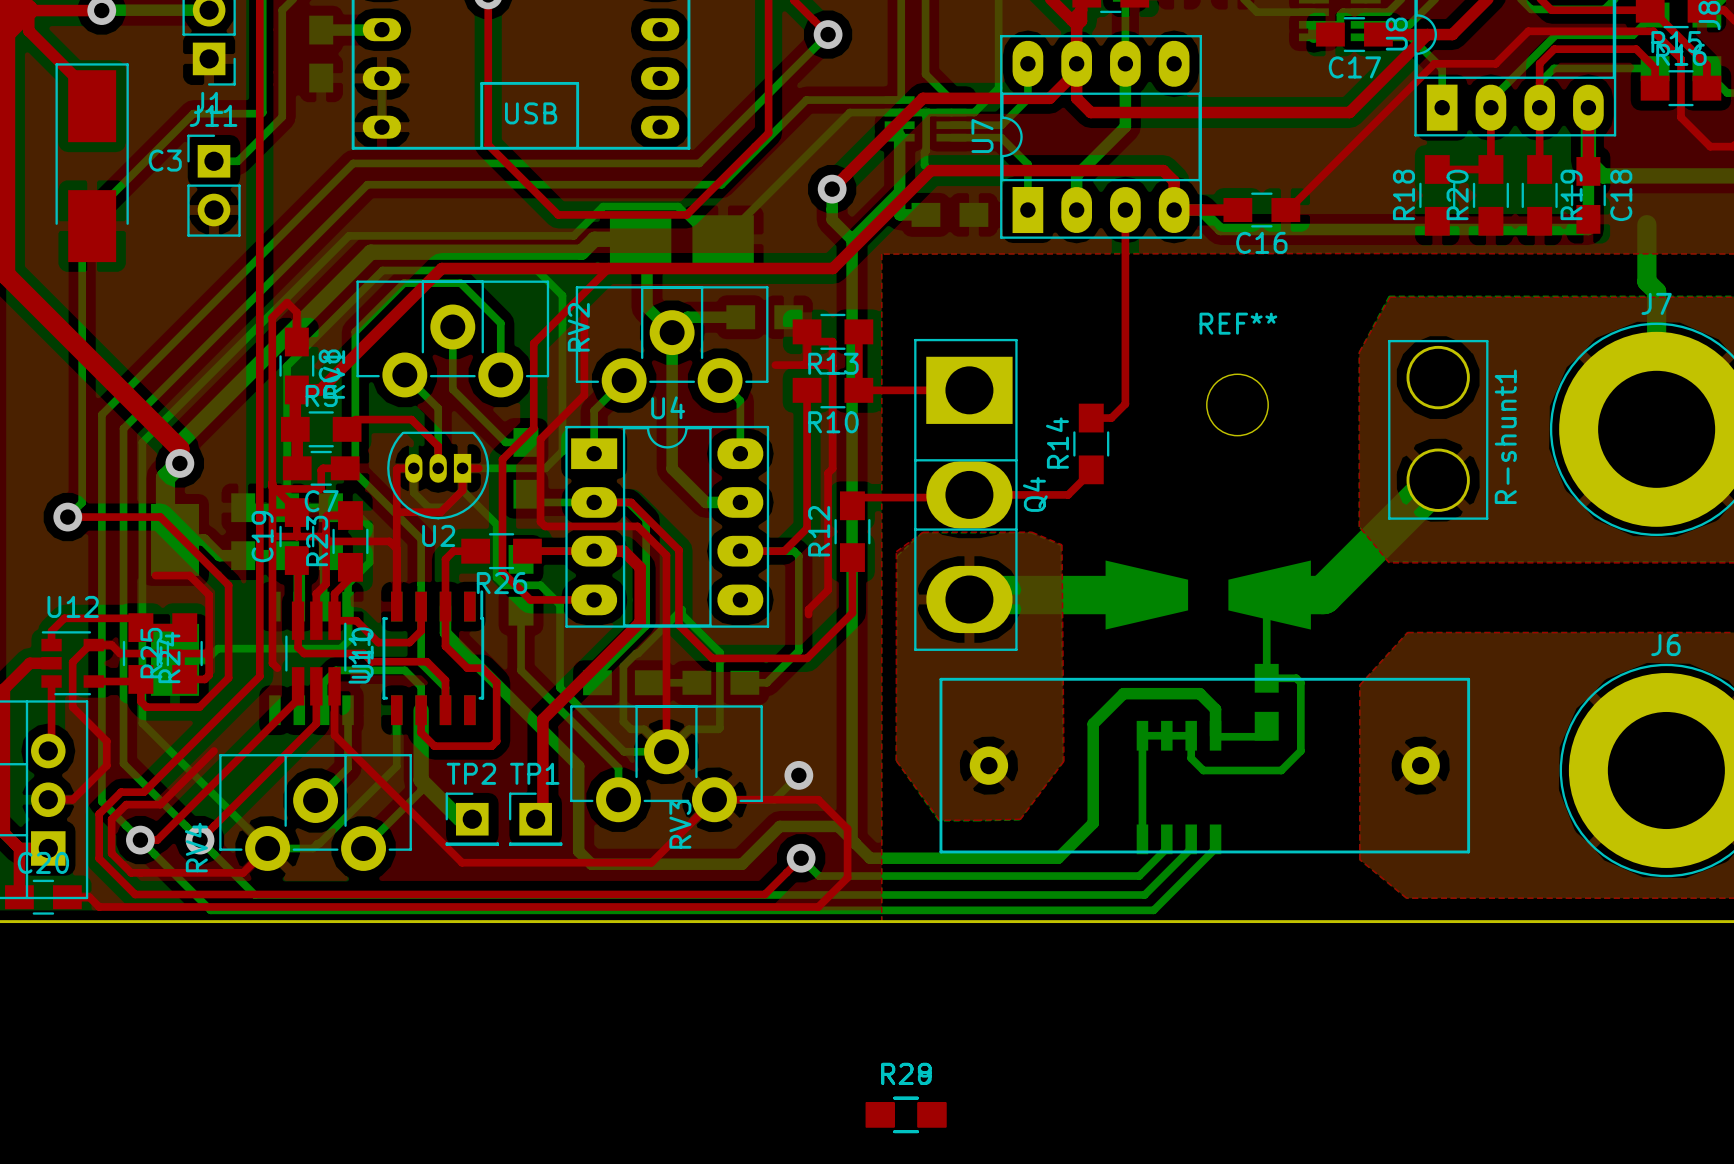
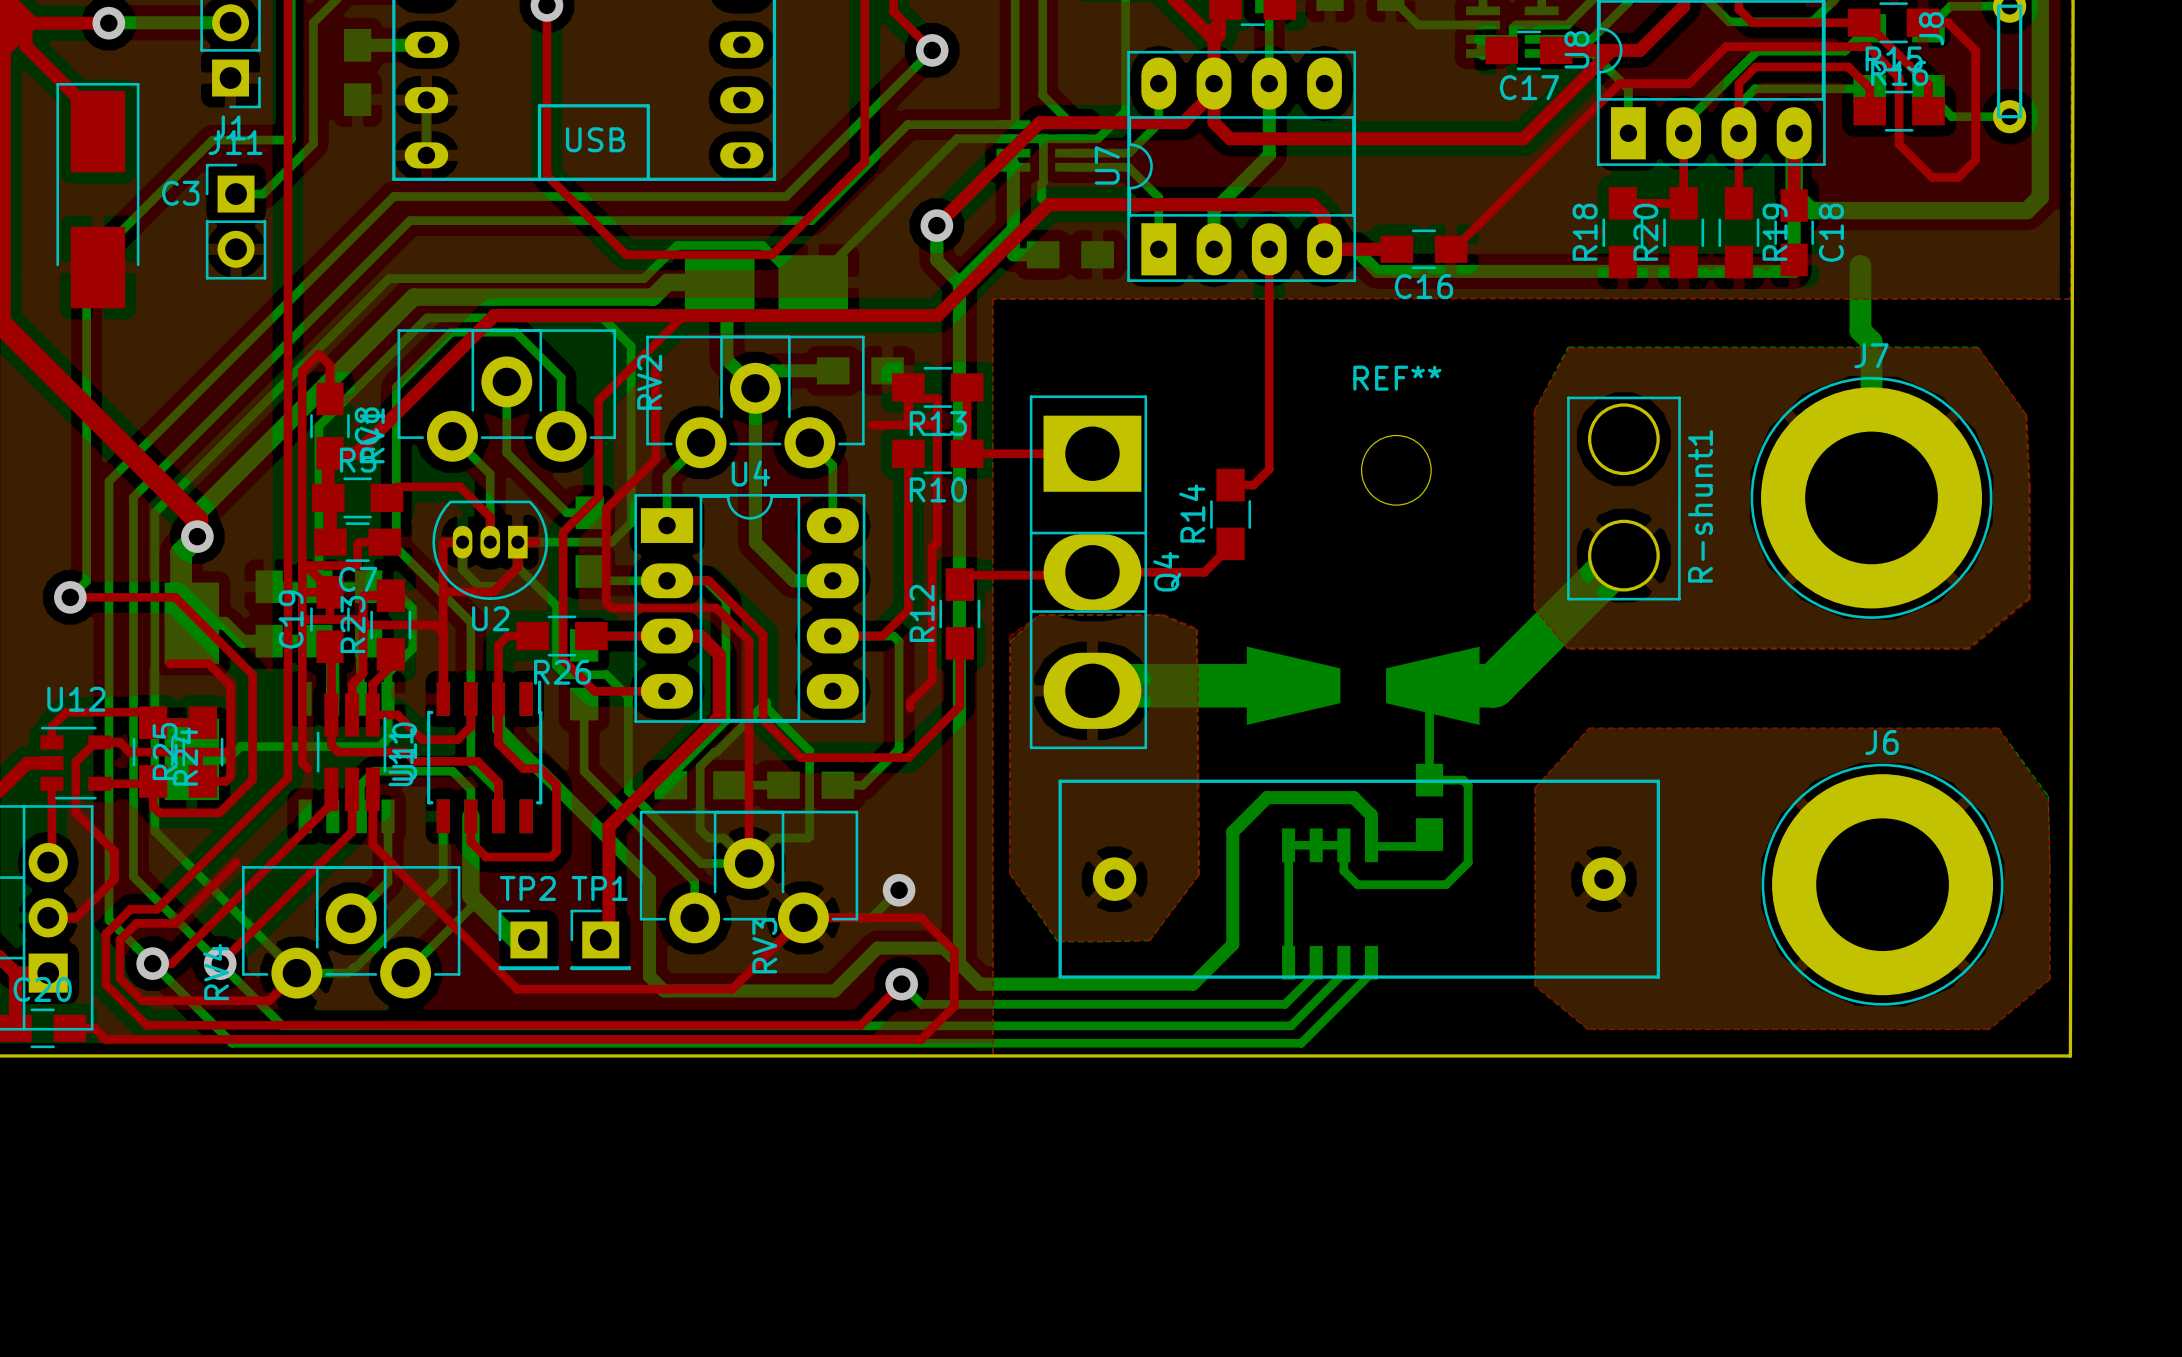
part: (906, 1114) -> none
part: (906, 1114) -> none

